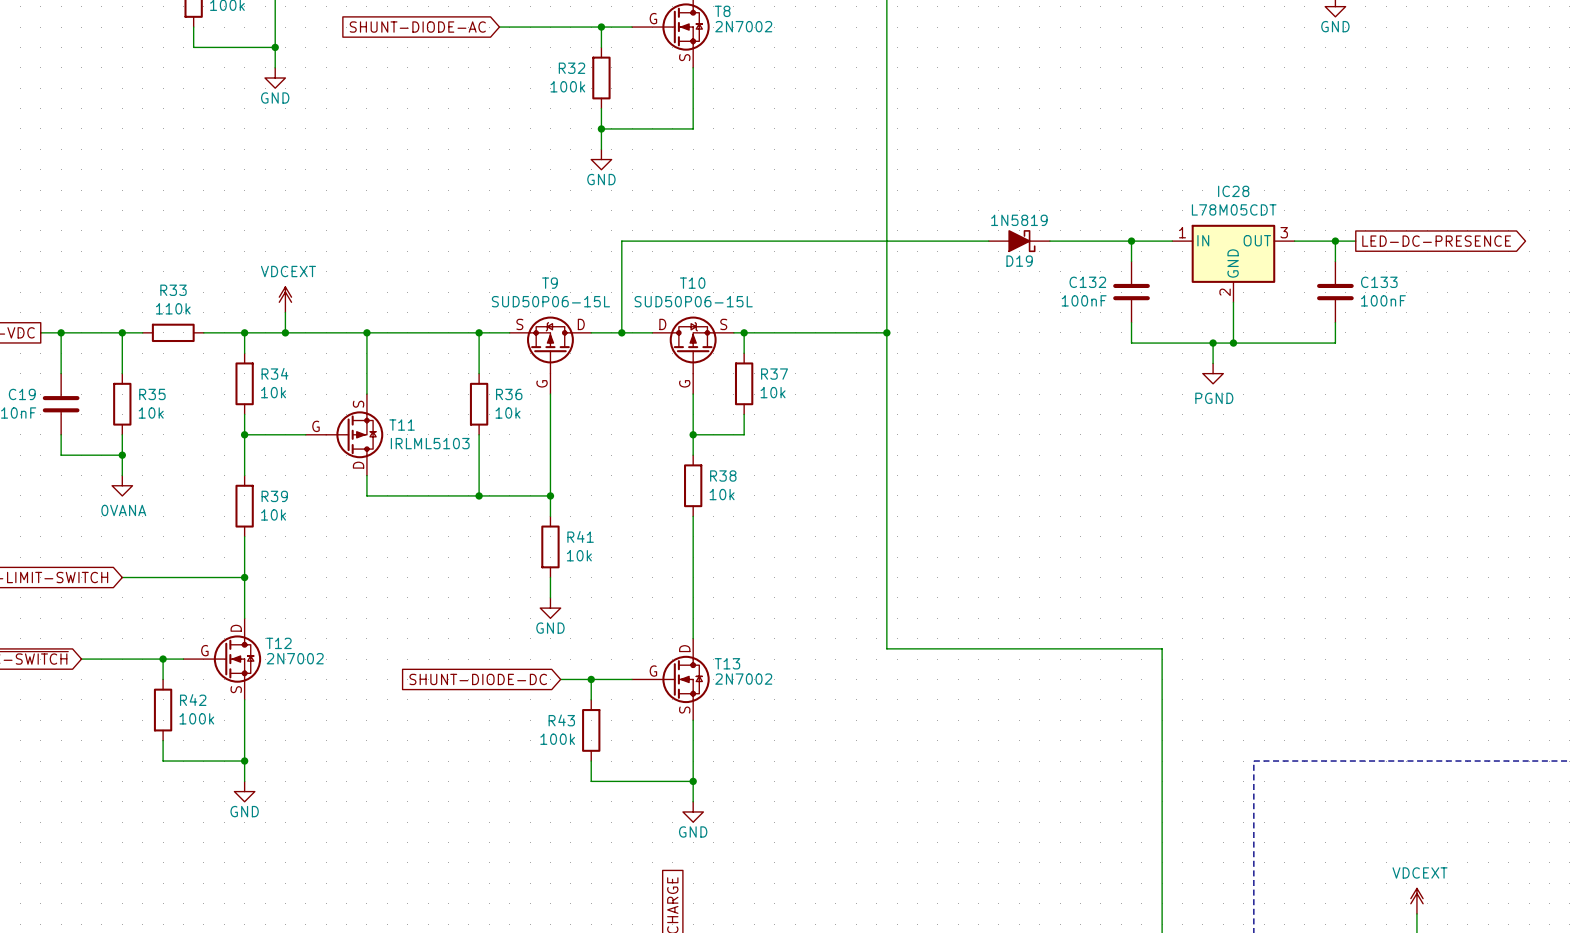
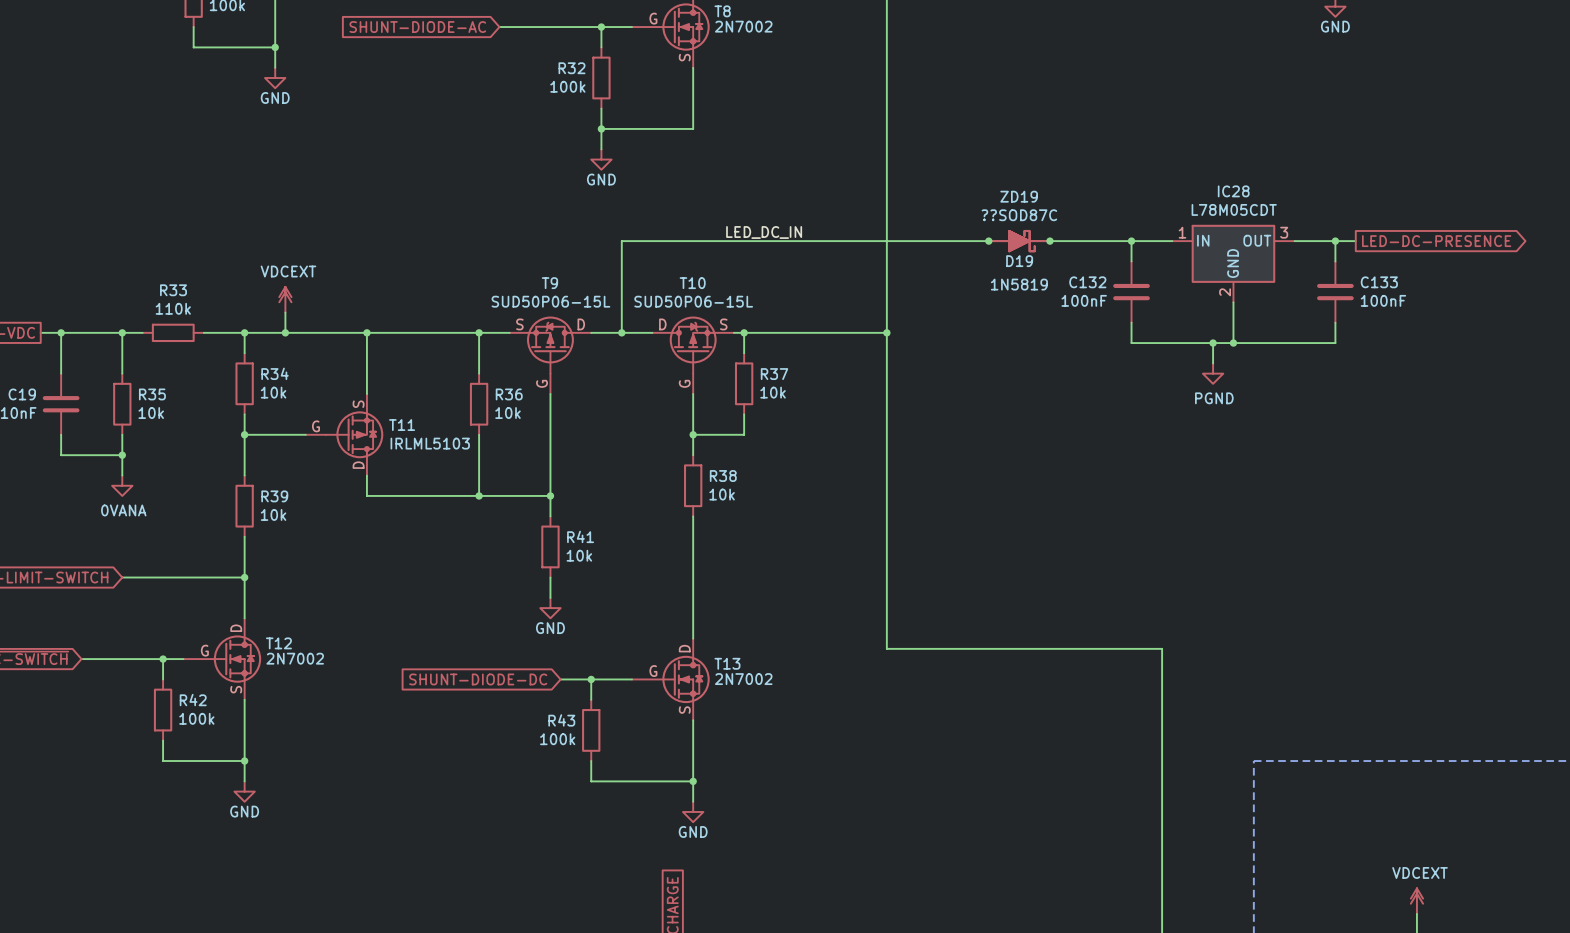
D19 value position: 1N5819 (1019, 220) -> 1N5819 (1019, 284)
label: none -> LED_DC_IN (764, 232)
junction: none -> (988, 241)
ZD19: none -> ??SOD87C (1019, 241)
junction: none -> (1049, 241)

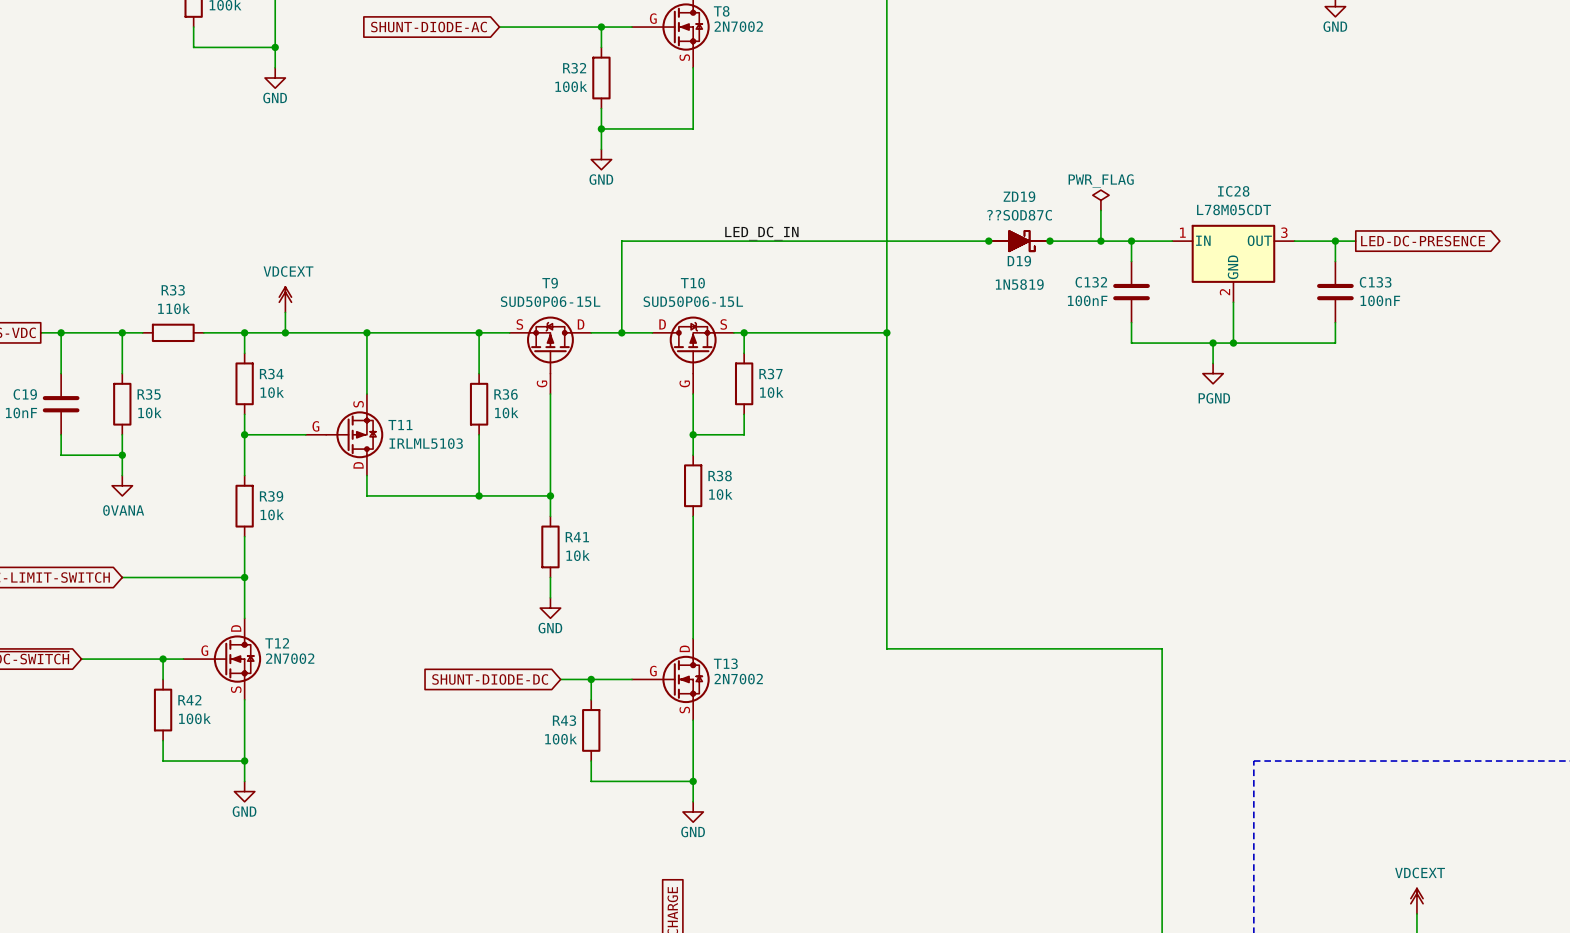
power symbol: none -> PWR_FLAG (1100, 200)
wire: none -> (1100, 210) (1100, 241)
junction: none -> (1100, 241)

